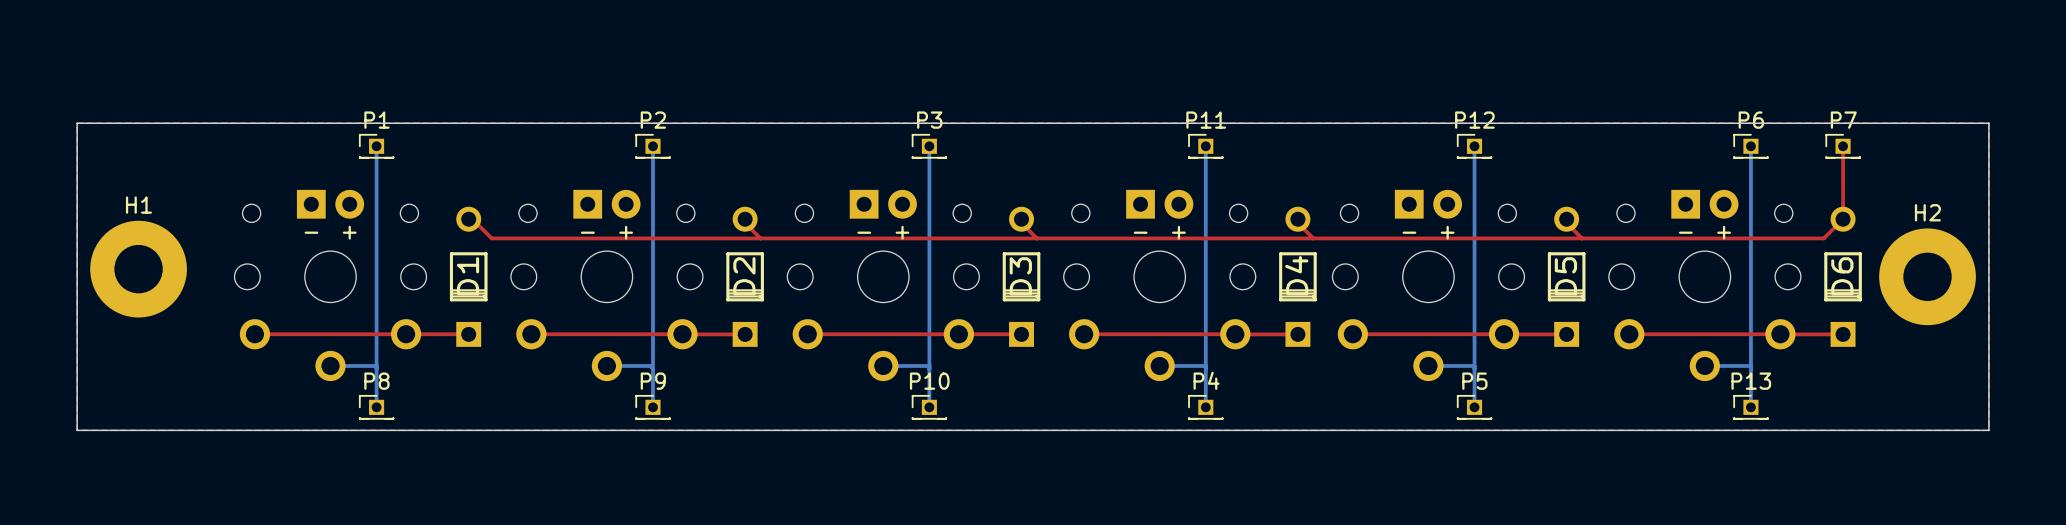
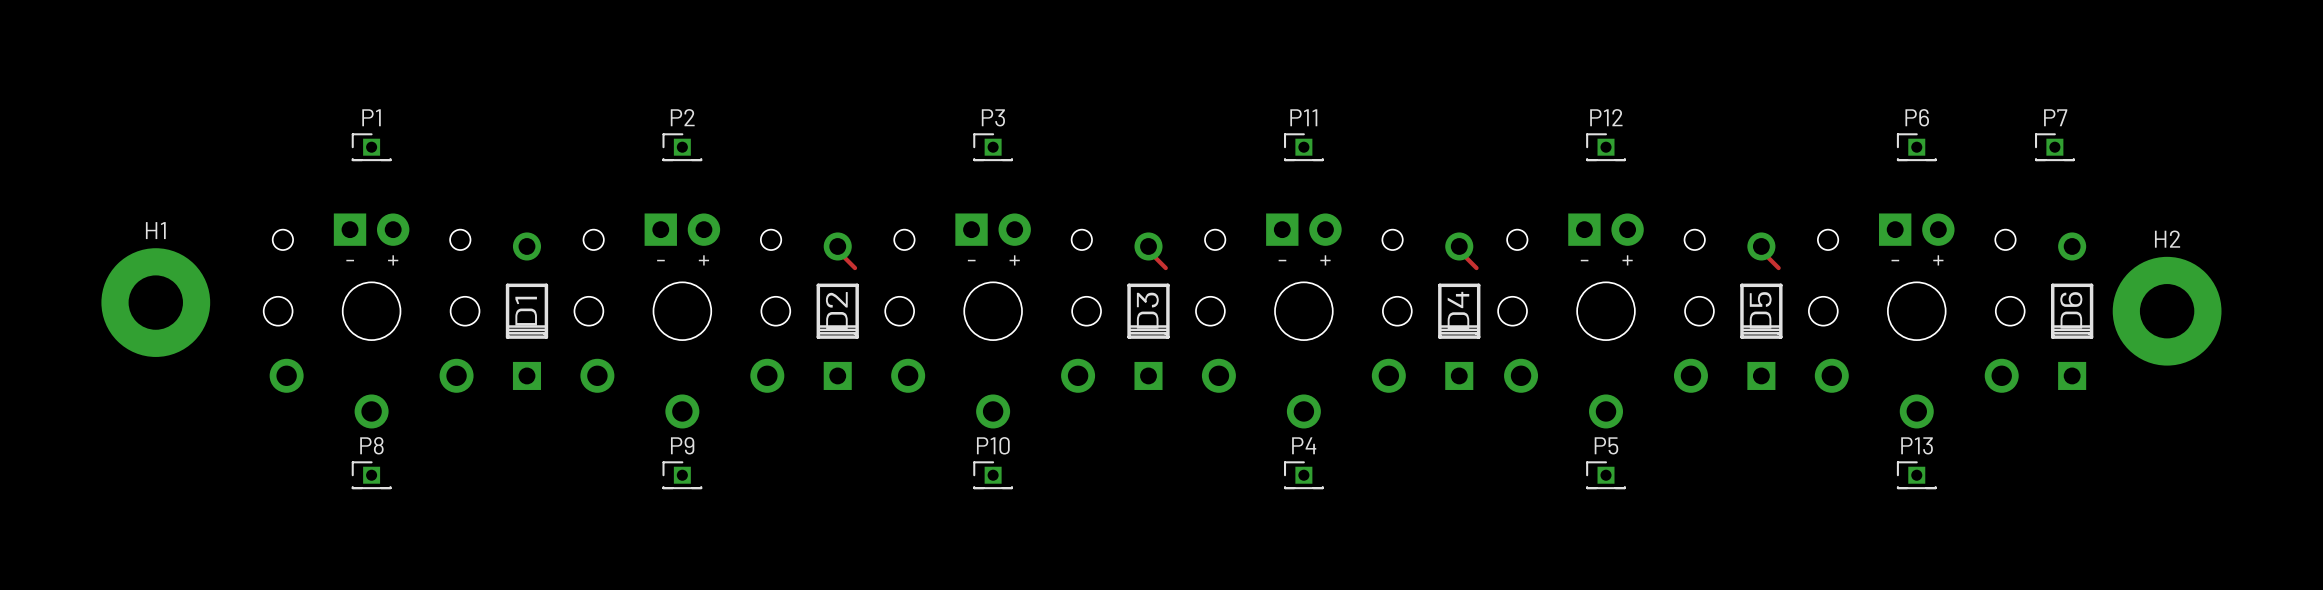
board edge: (77, 123) (1988, 123) (1988, 430) (77, 430) (77, 123) -> none
bottom track: (376, 146) (376, 407) -> none
P1 position: (376, 146) -> (371, 147)
bottom track: (652, 146) (652, 407) -> none
P2 position: (652, 146) -> (682, 147)
bottom track: (929, 146) (929, 407) -> none
P3 position: (929, 146) -> (993, 147)
bottom track: (1205, 146) (1205, 407) -> none
P11 position: (1205, 146) -> (1303, 147)
bottom track: (1474, 146) (1474, 407) -> none
P12 position: (1474, 146) -> (1606, 147)
bottom track: (1750, 146) (1750, 407) -> none
P6 position: (1750, 146) -> (1916, 147)
top track: (1843, 146) (1843, 219) (1823, 238) (491, 238) (472, 219) (468, 219) -> none
P7 position: (1843, 146) -> (2054, 147)
top track: (254, 334) (468, 334) -> none
top track: (531, 334) (682, 334) -> none
top track: (682, 334) (745, 334) -> none
top track: (807, 334) (1021, 334) -> none
top track: (1084, 334) (1235, 334) -> none
top track: (1235, 334) (1297, 334) -> none
top track: (1352, 334) (1504, 334) -> none
top track: (1504, 334) (1566, 334) -> none
top track: (1629, 334) (1780, 334) -> none
top track: (1780, 334) (1843, 334) -> none
bottom track: (330, 365) (376, 365) -> none
bottom track: (606, 365) (650, 365) (652, 368) -> none
bottom track: (883, 365) (929, 365) -> none
bottom track: (1159, 365) (1205, 365) -> none
bottom track: (1428, 365) (1474, 365) -> none
bottom track: (1704, 365) (1750, 365) -> none
P8 position: (376, 407) -> (371, 475)
P9 position: (652, 407) -> (682, 475)
P10 position: (929, 407) -> (993, 475)
P4 position: (1205, 407) -> (1303, 475)
P5 position: (1474, 407) -> (1606, 475)
P13 position: (1750, 407) -> (1916, 475)

